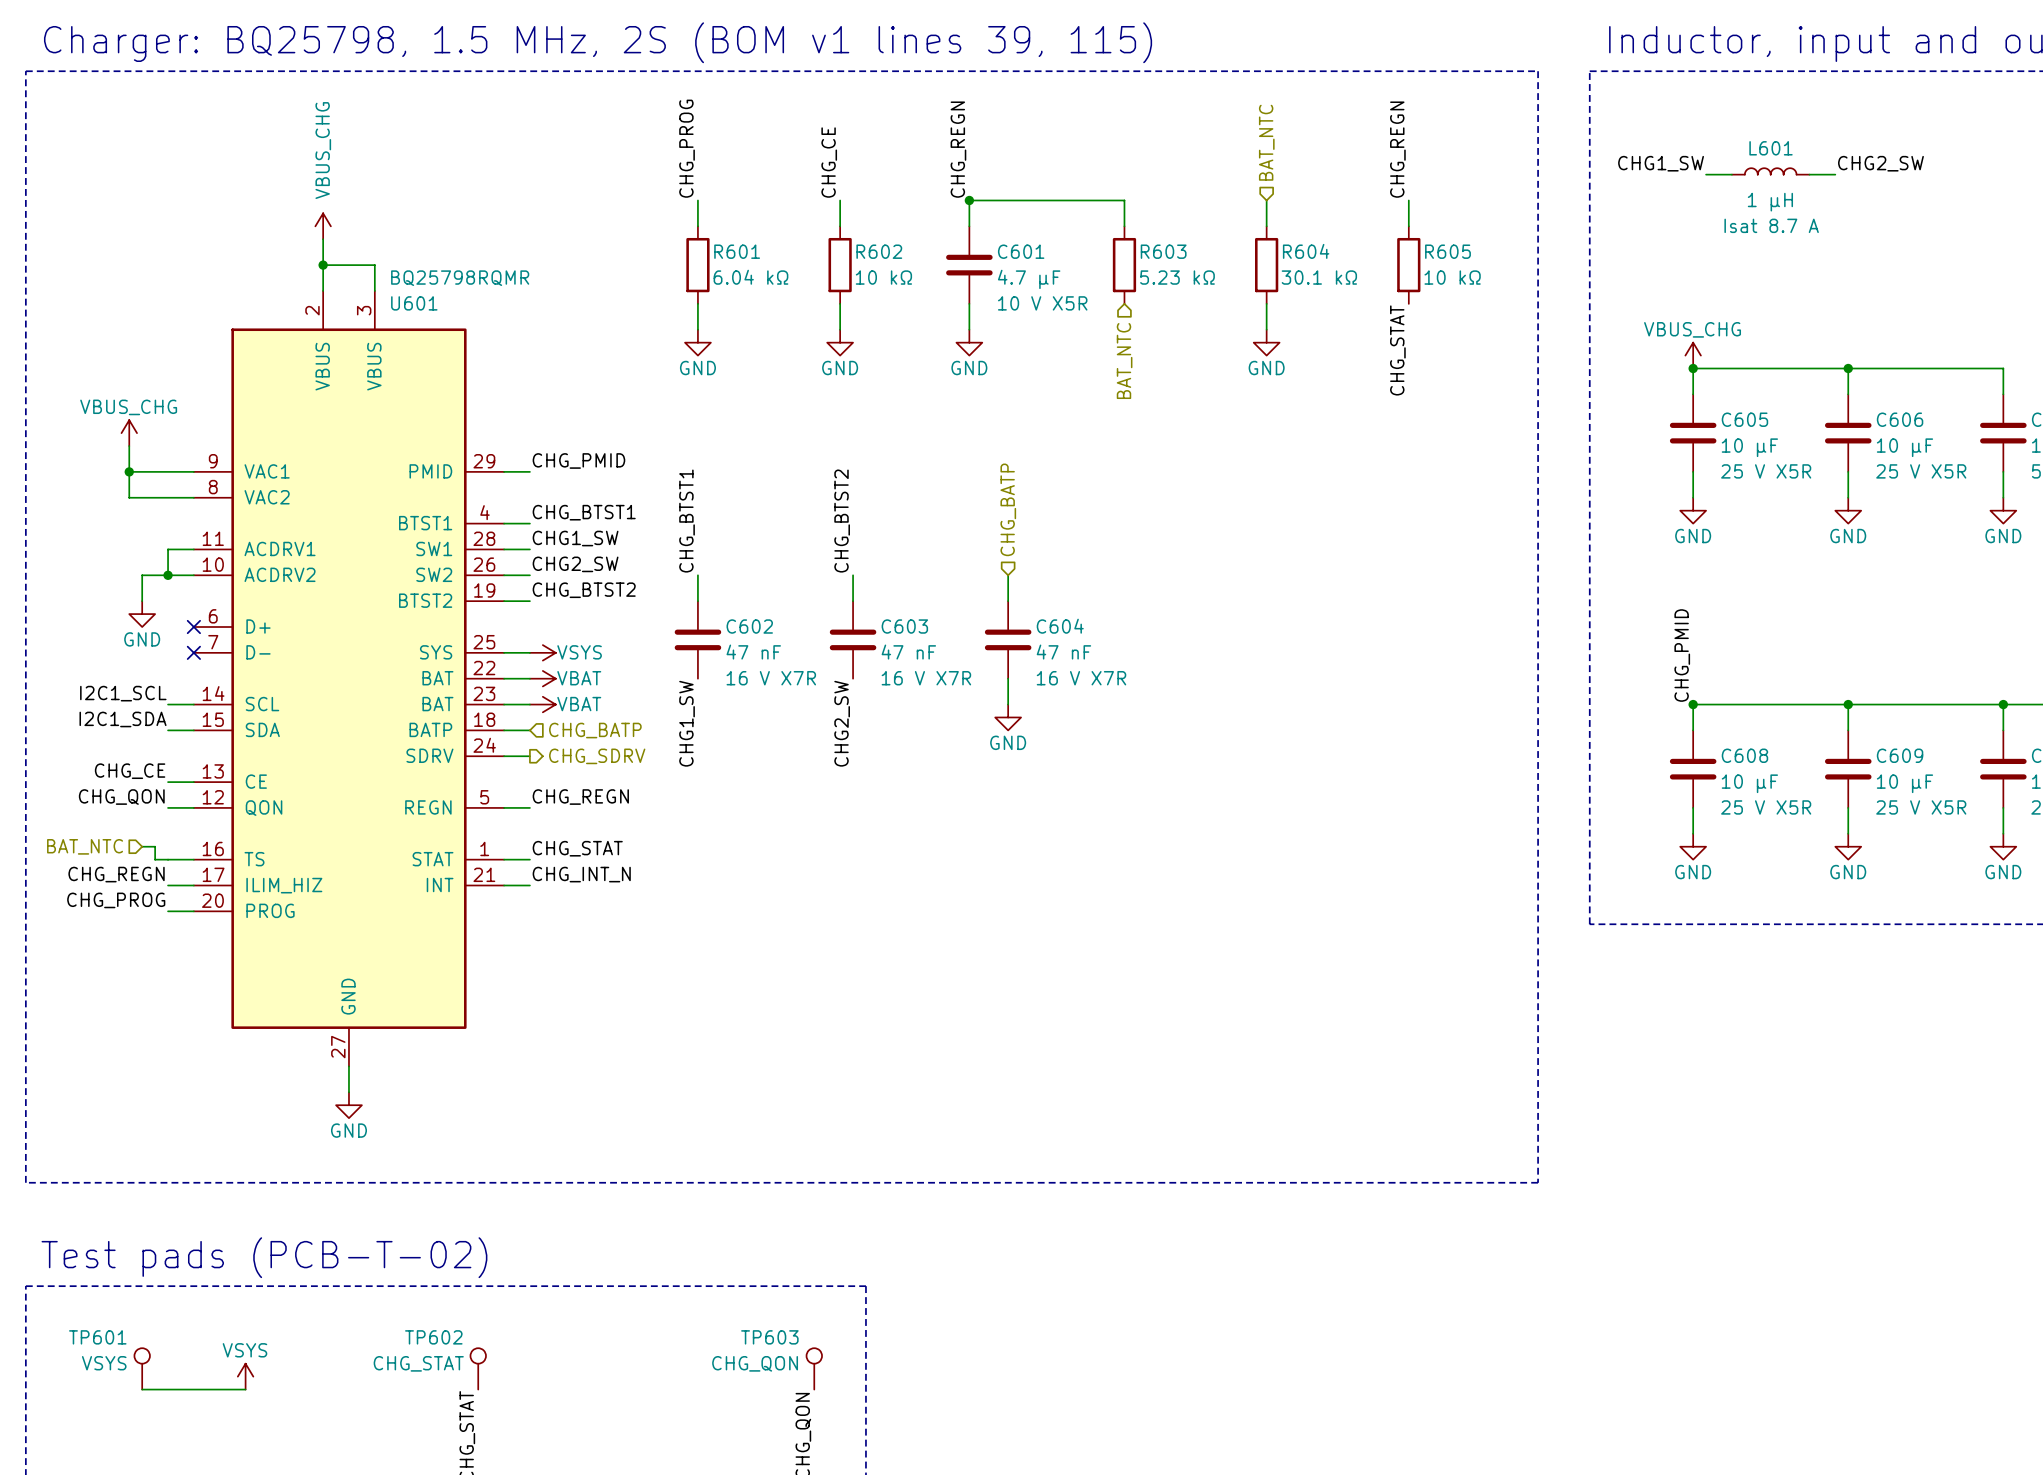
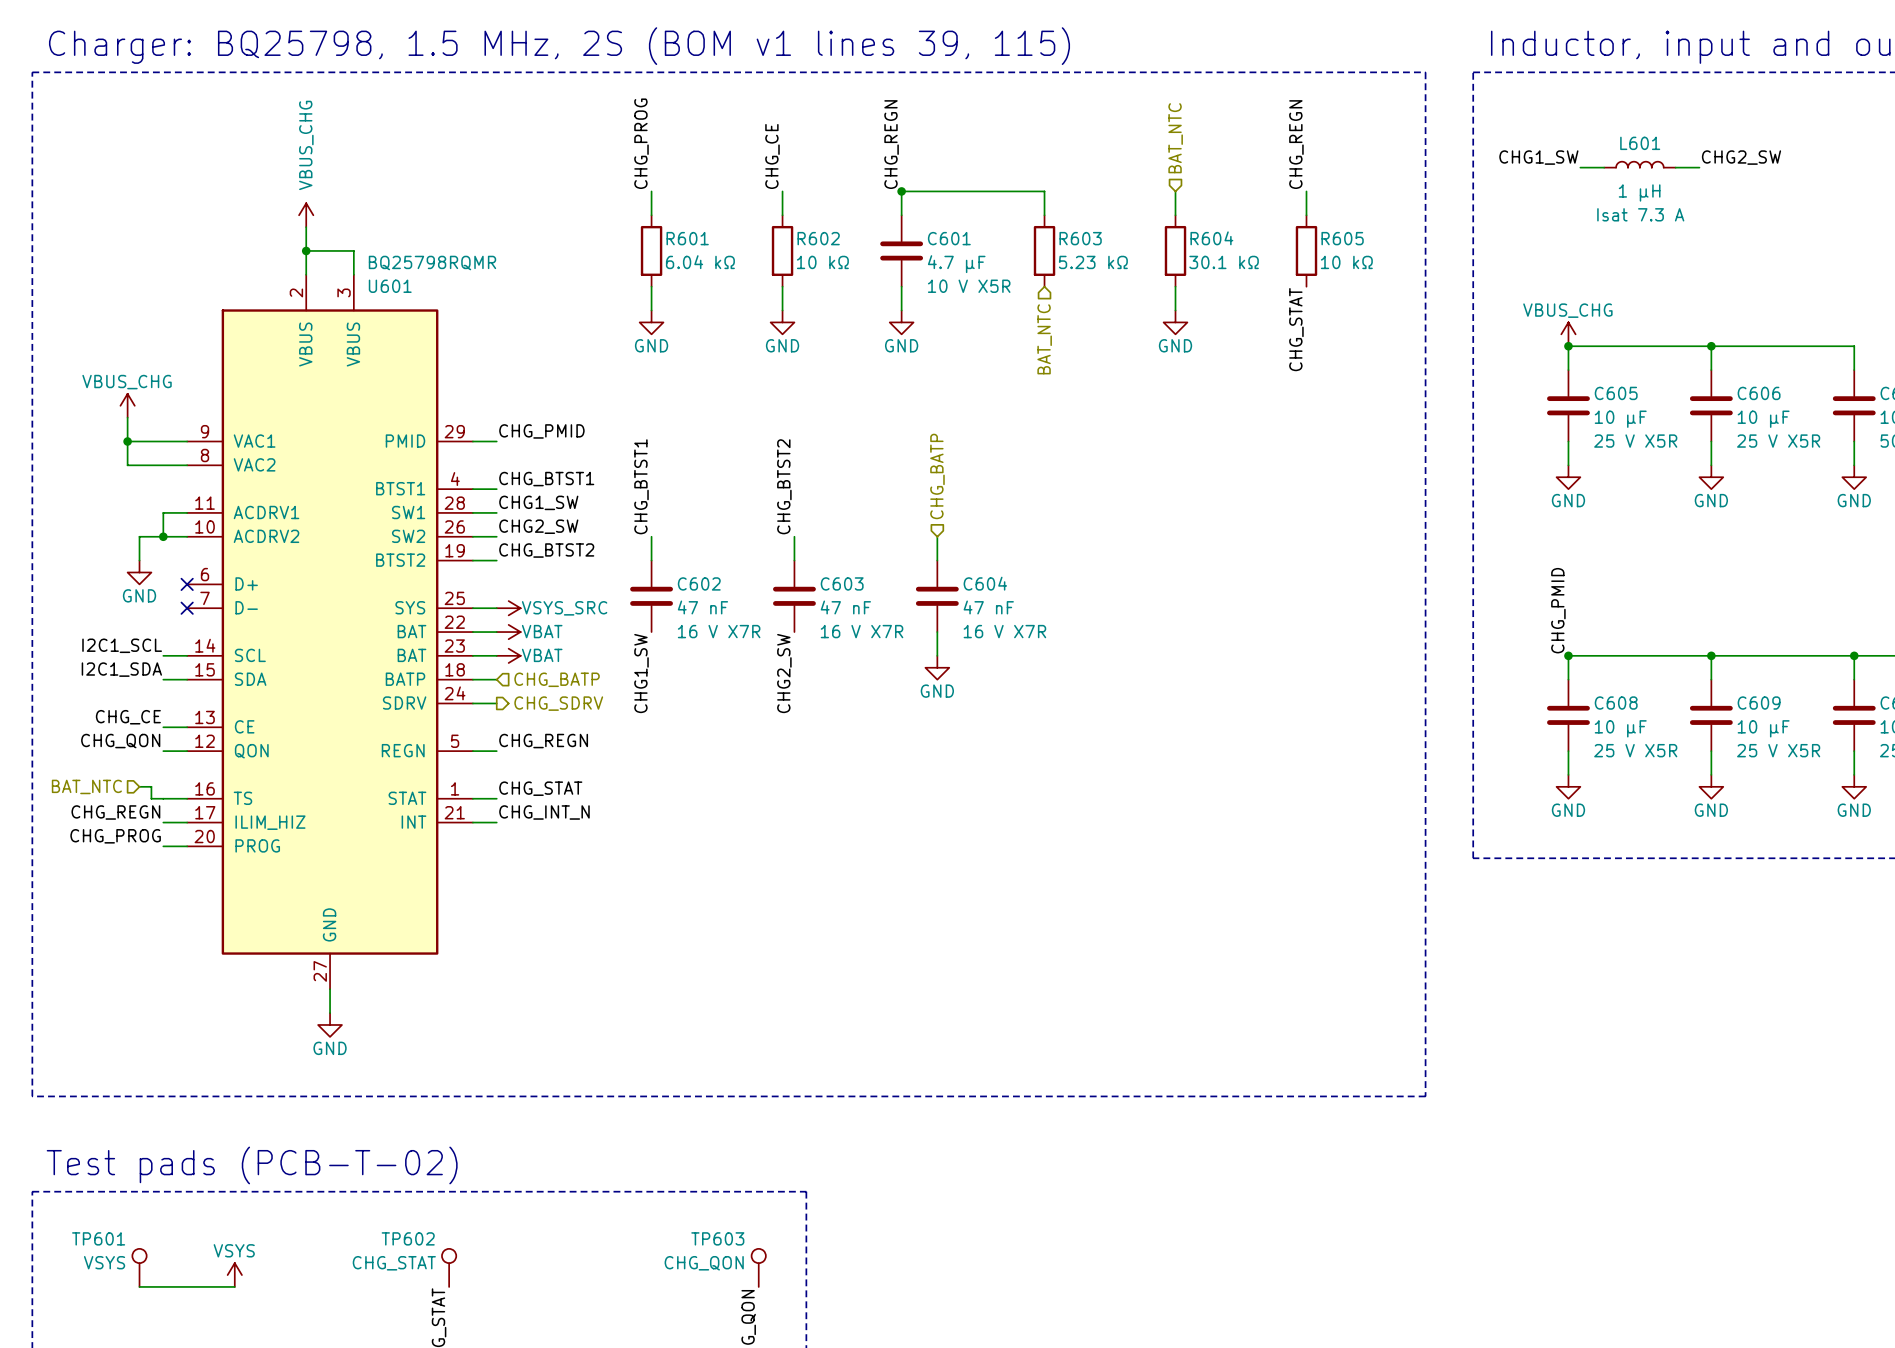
L601 text: Isat 8.7 A (1771, 225) -> Isat 7.3 A (1640, 214)
power symbol: VSYS (542, 652) -> VSYS_SRC (508, 608)

